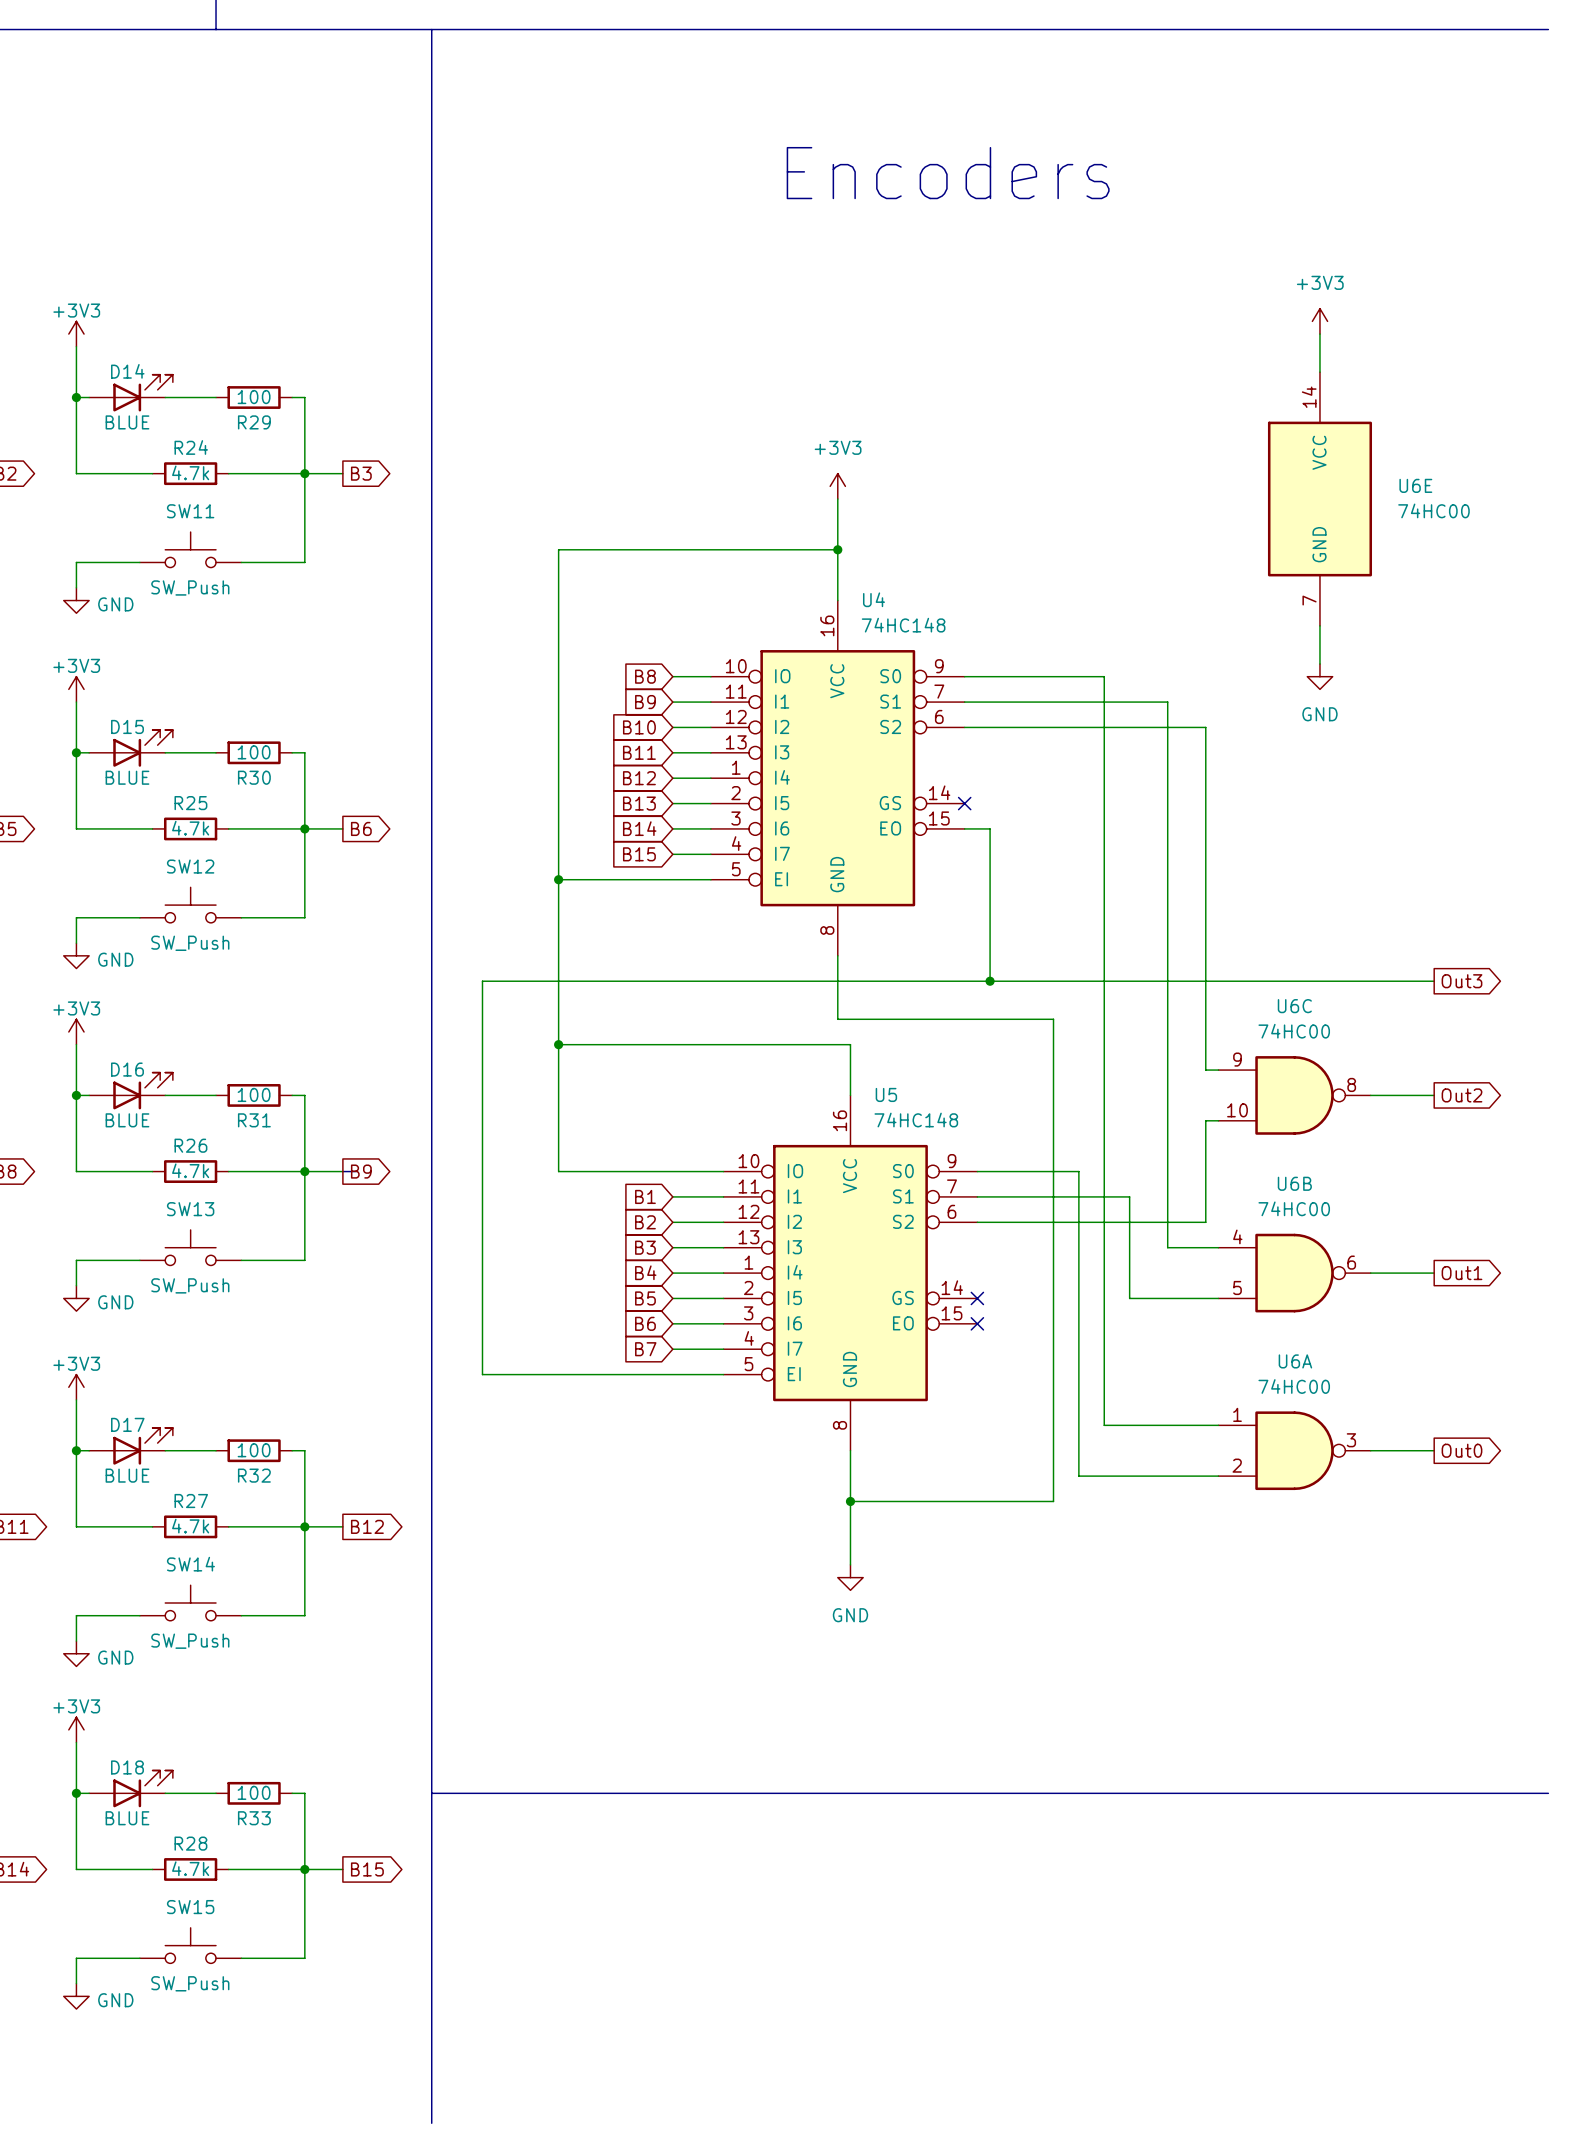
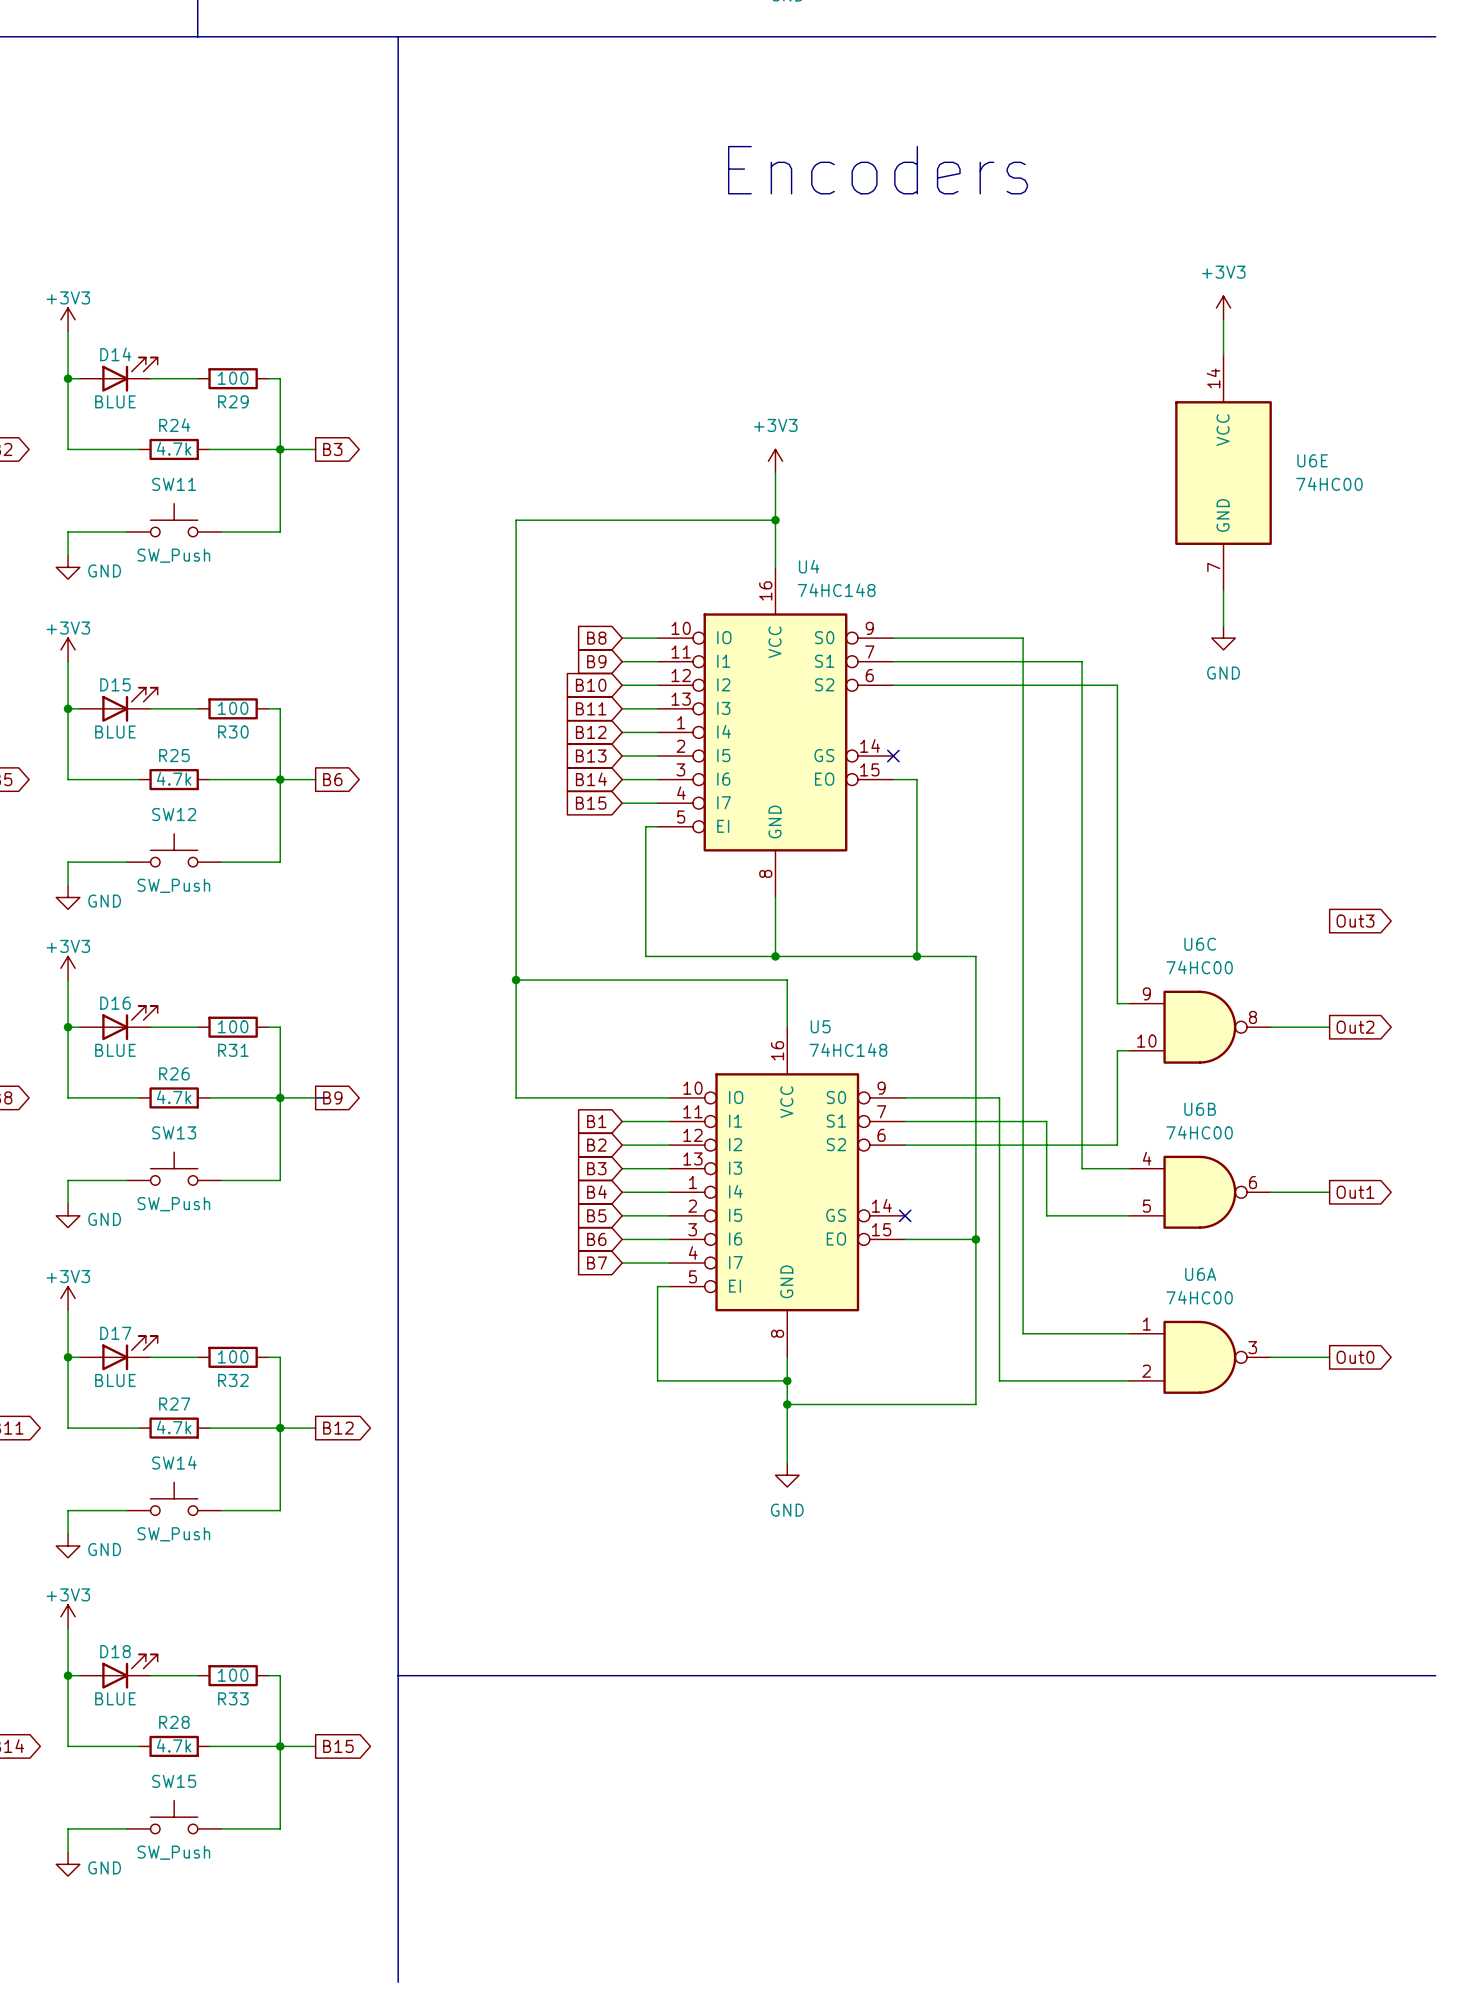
wire: (558, 879) (698, 879) -> (775, 956) (645, 956) (645, 826)
junction: (558, 879) -> none
wire: none -> (916, 921) (916, 956)
junction position: (990, 981) -> (916, 956)
wire: (1434, 981) (482, 981) (482, 1374) (710, 1374) -> (787, 1380) (657, 1380) (657, 1286)
junction: none -> (775, 956)
wire: none -> (905, 1239) (975, 1239)
no-connect mark: (977, 1323) -> none
junction: none -> (975, 1239)
junction: none -> (787, 1380)

